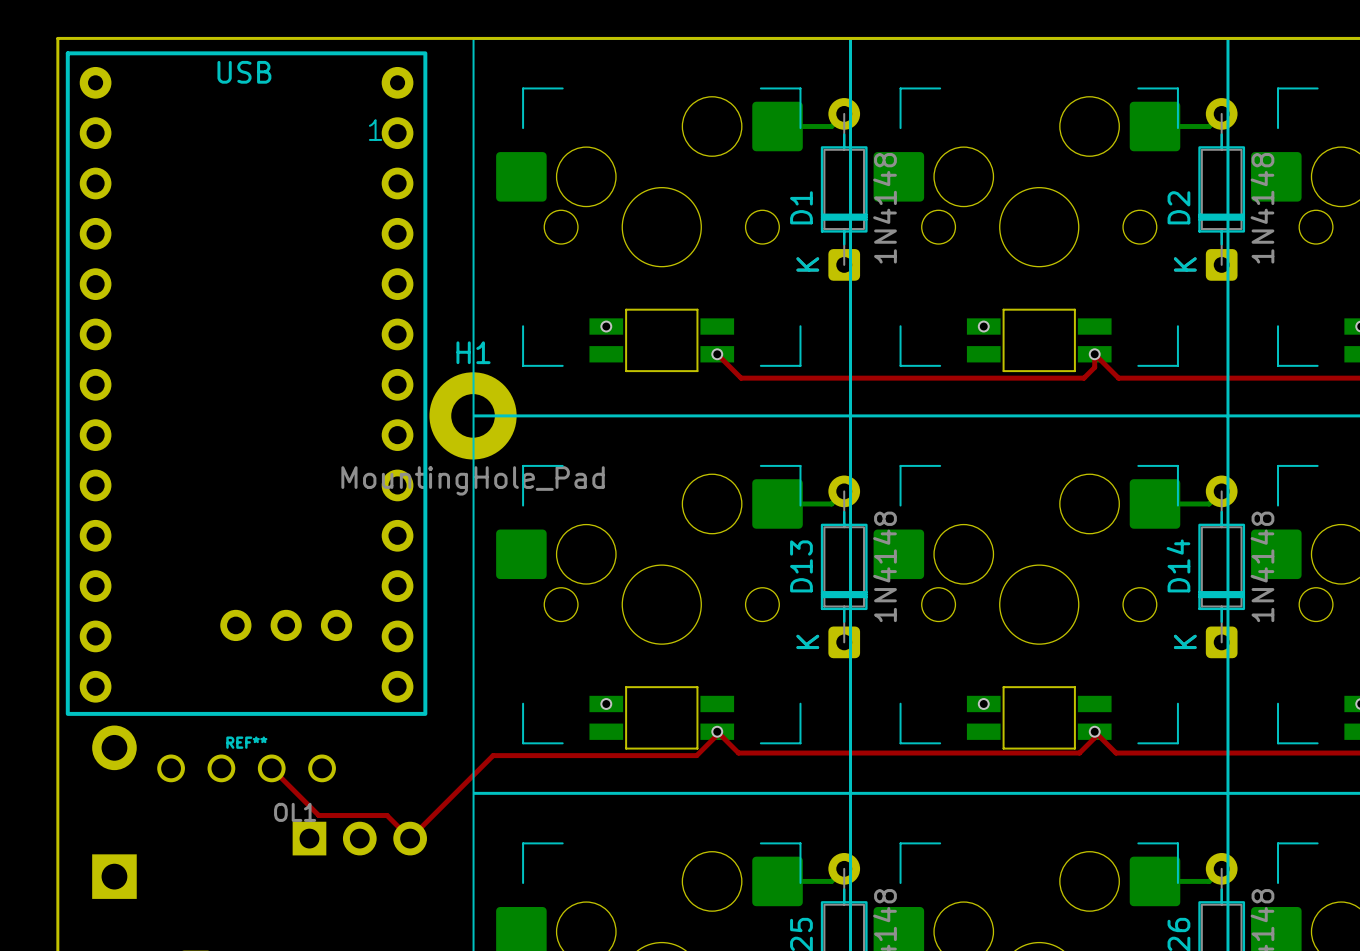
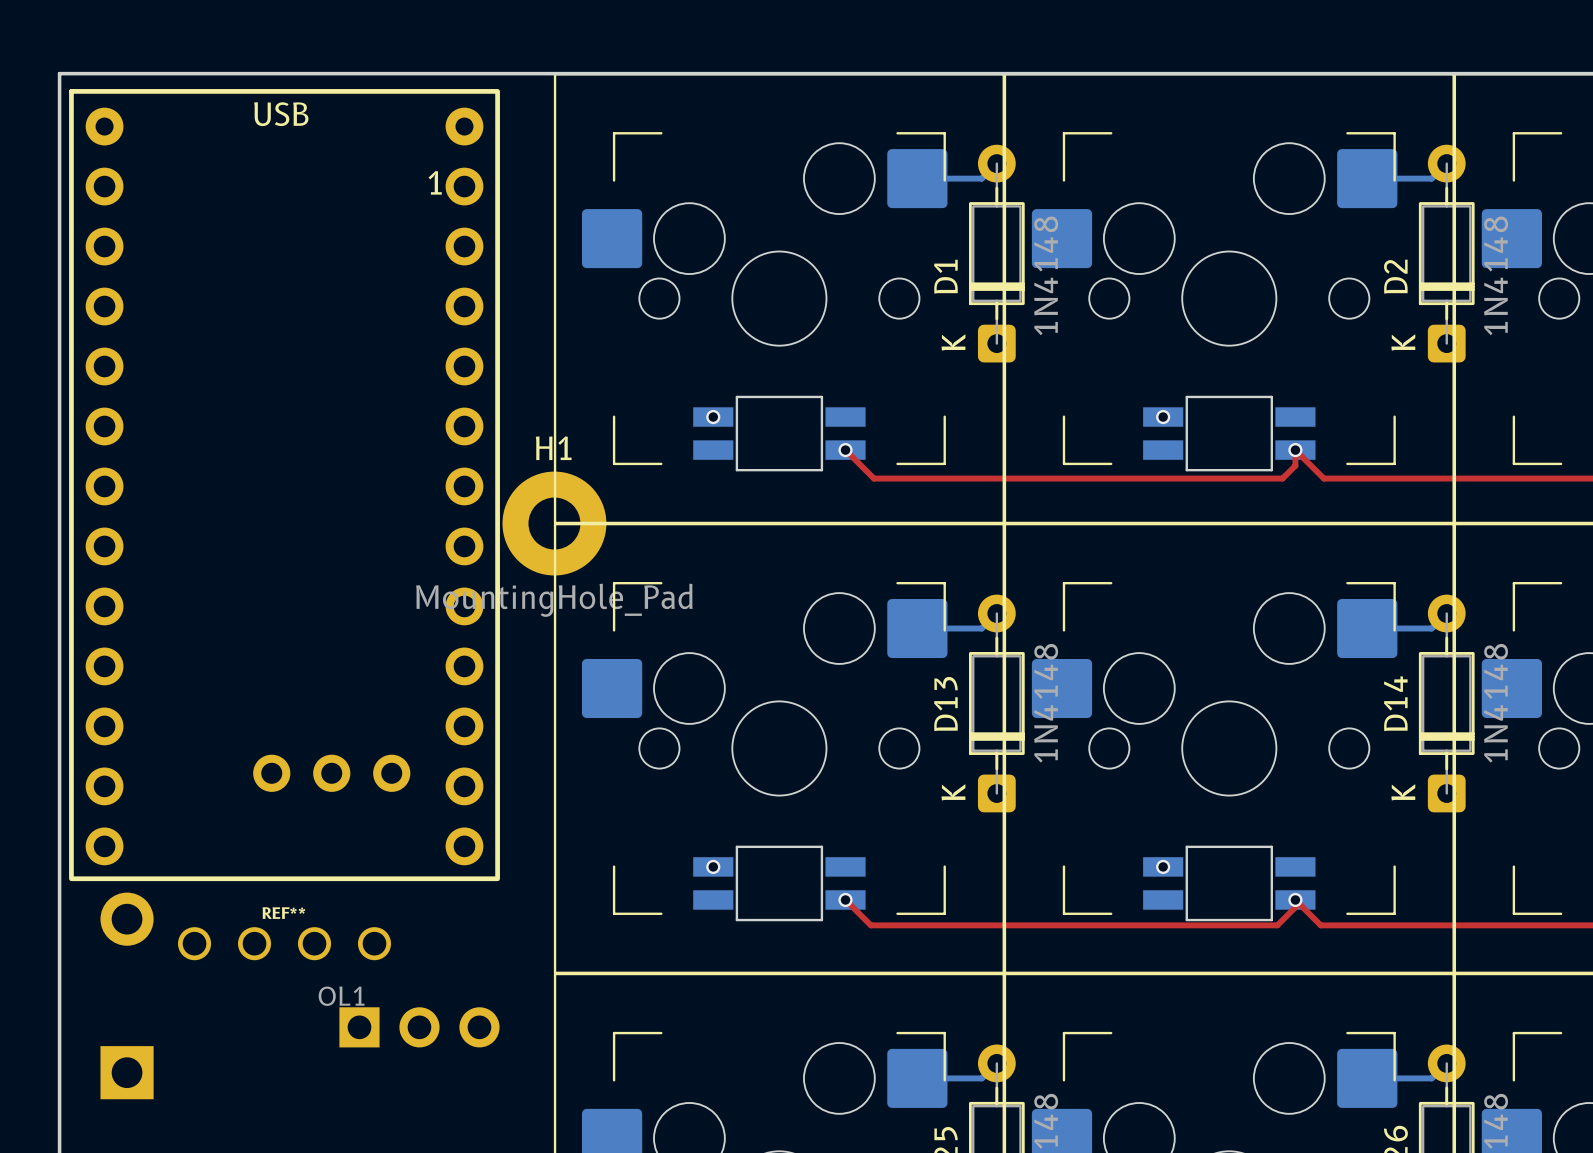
top track: (717, 731) (717, 735) (696, 755) (493, 755) (410, 838) (387, 815) (318, 815) (271, 768) -> none

